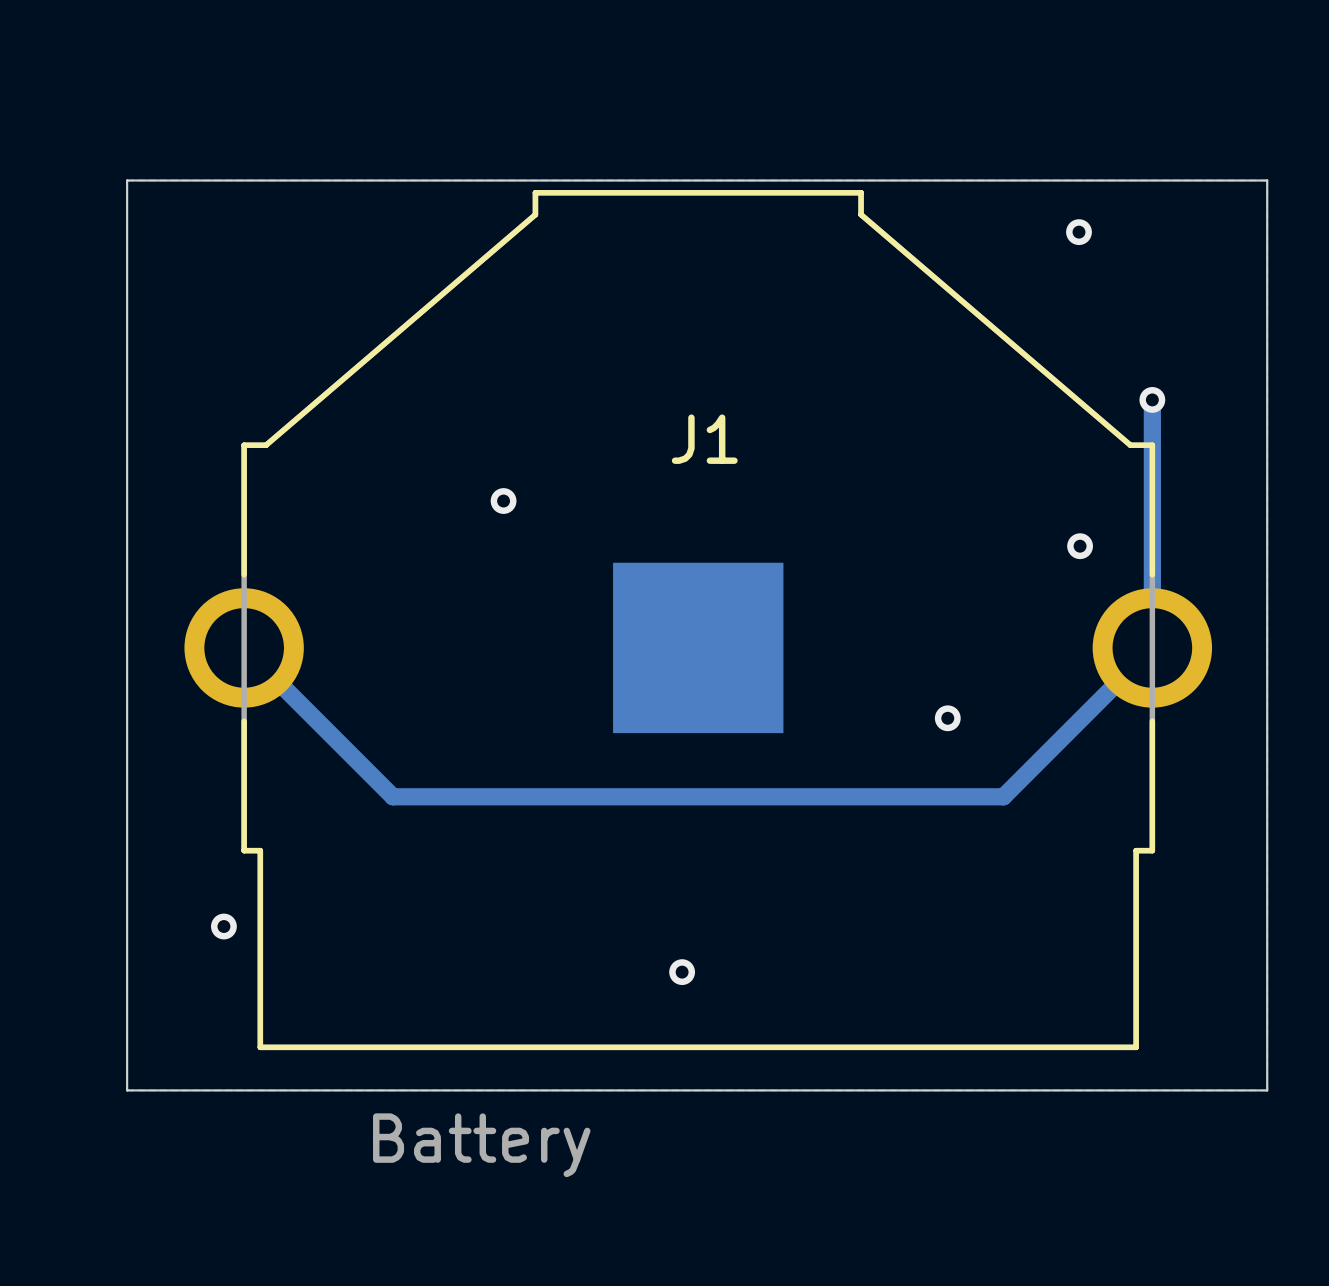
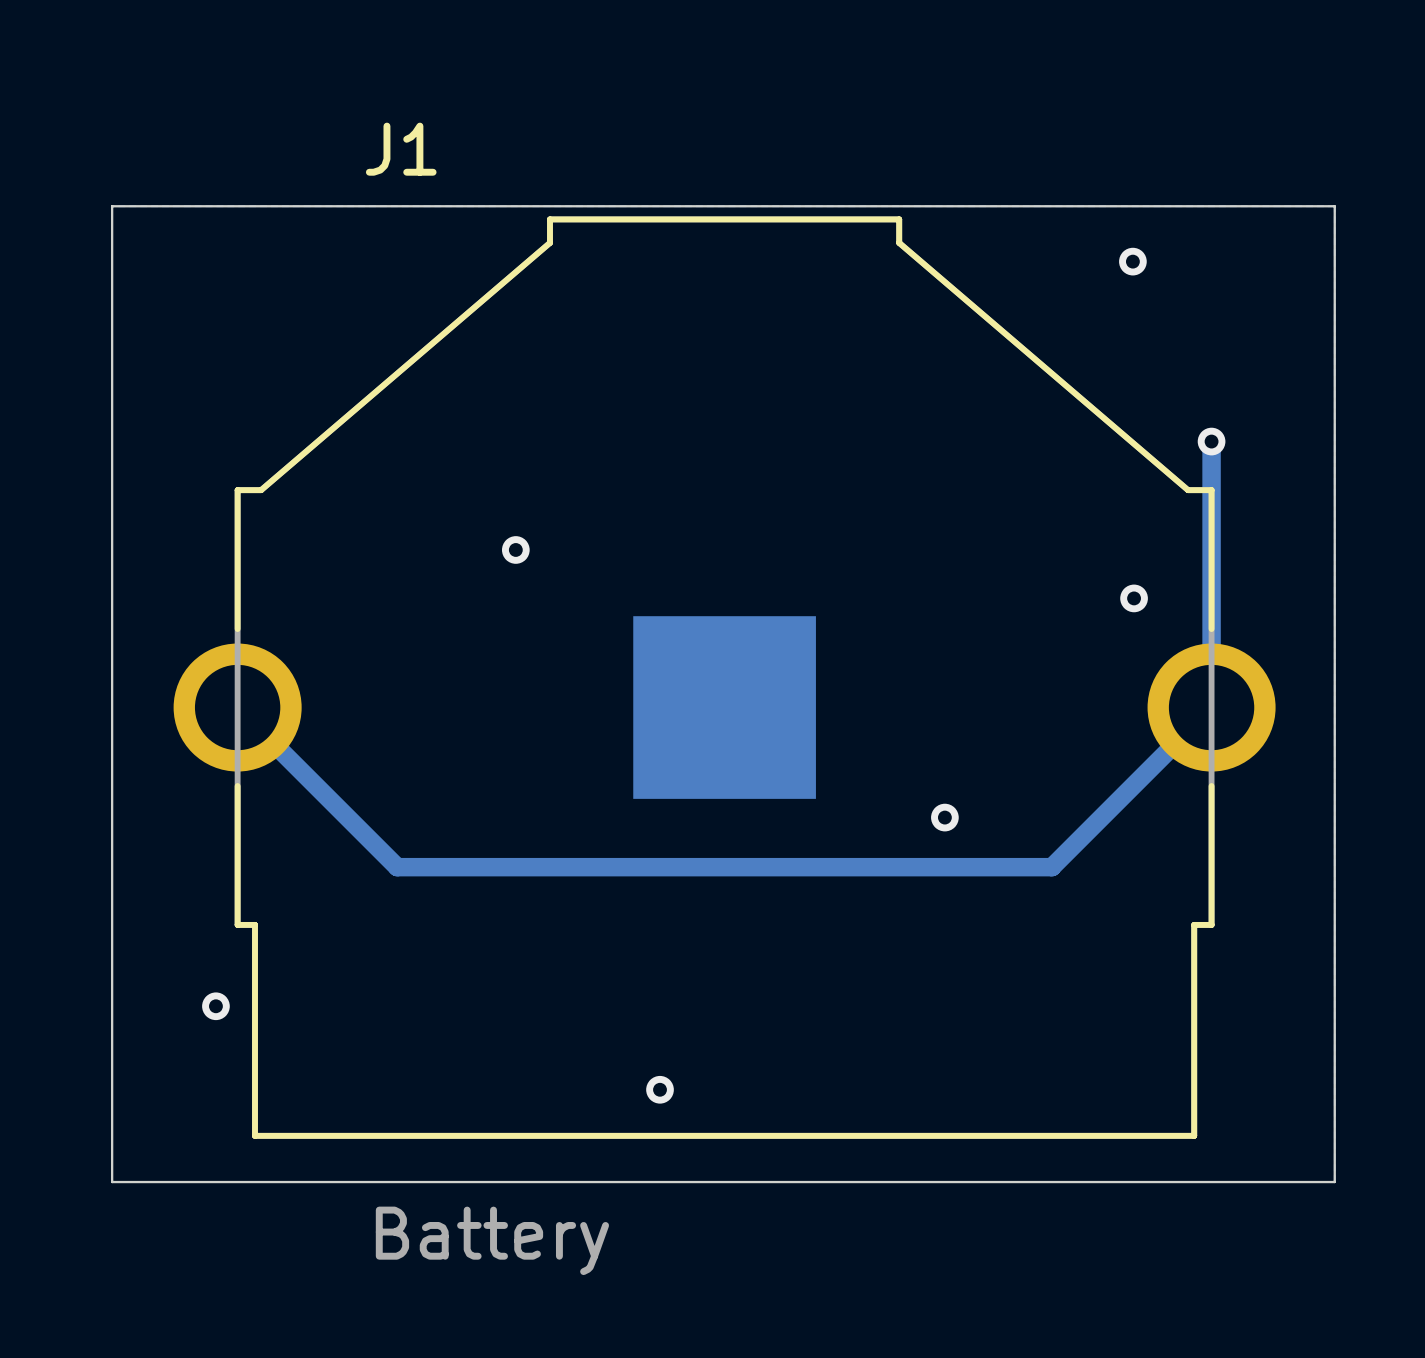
J1 name position: J1 (704, 439) -> J1 (401, 149)
via position: (947, 718) -> (944, 817)
via position: (682, 972) -> (660, 1089)

